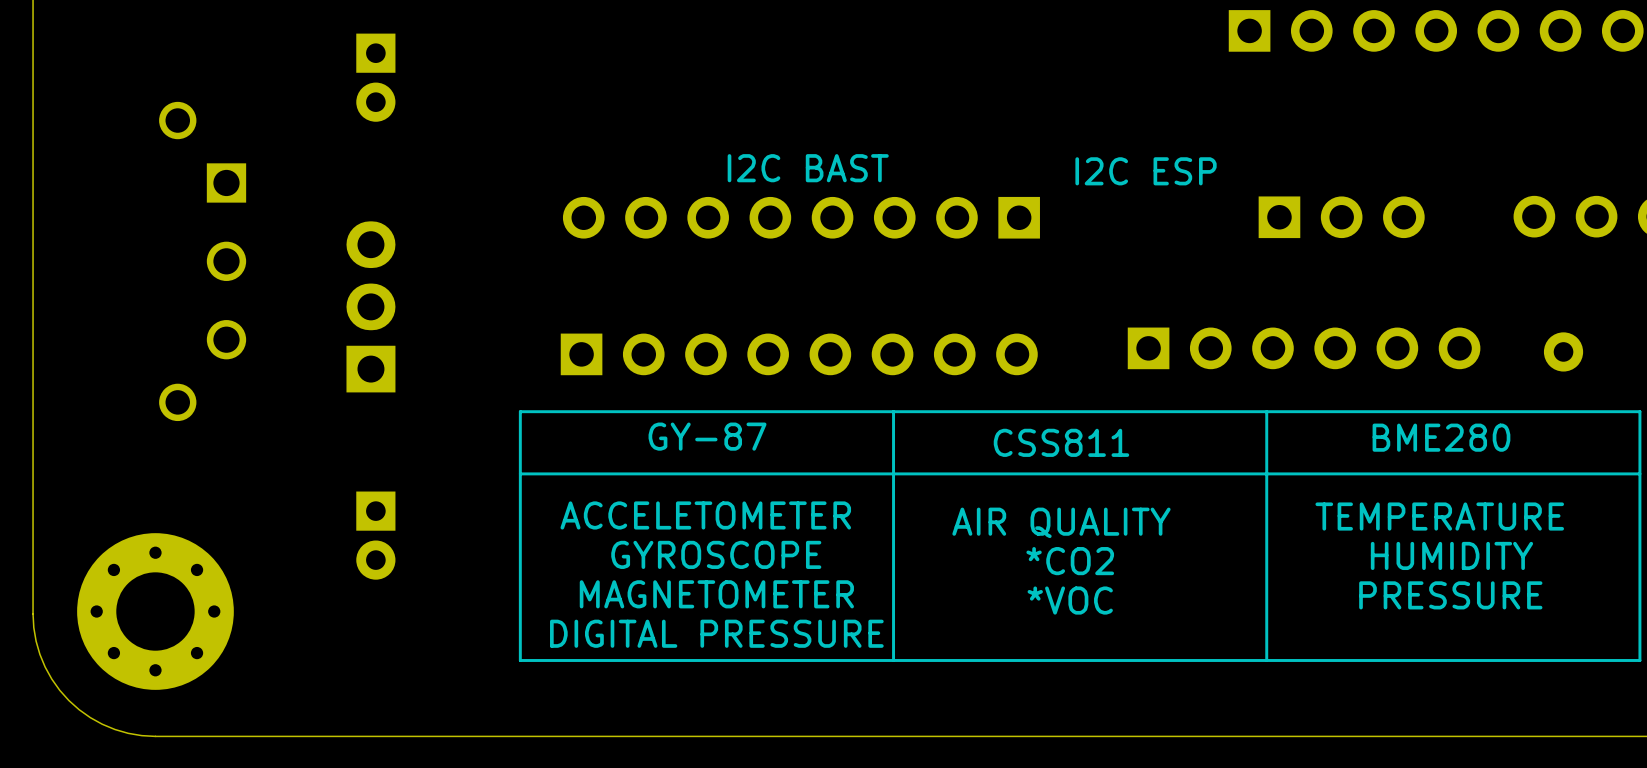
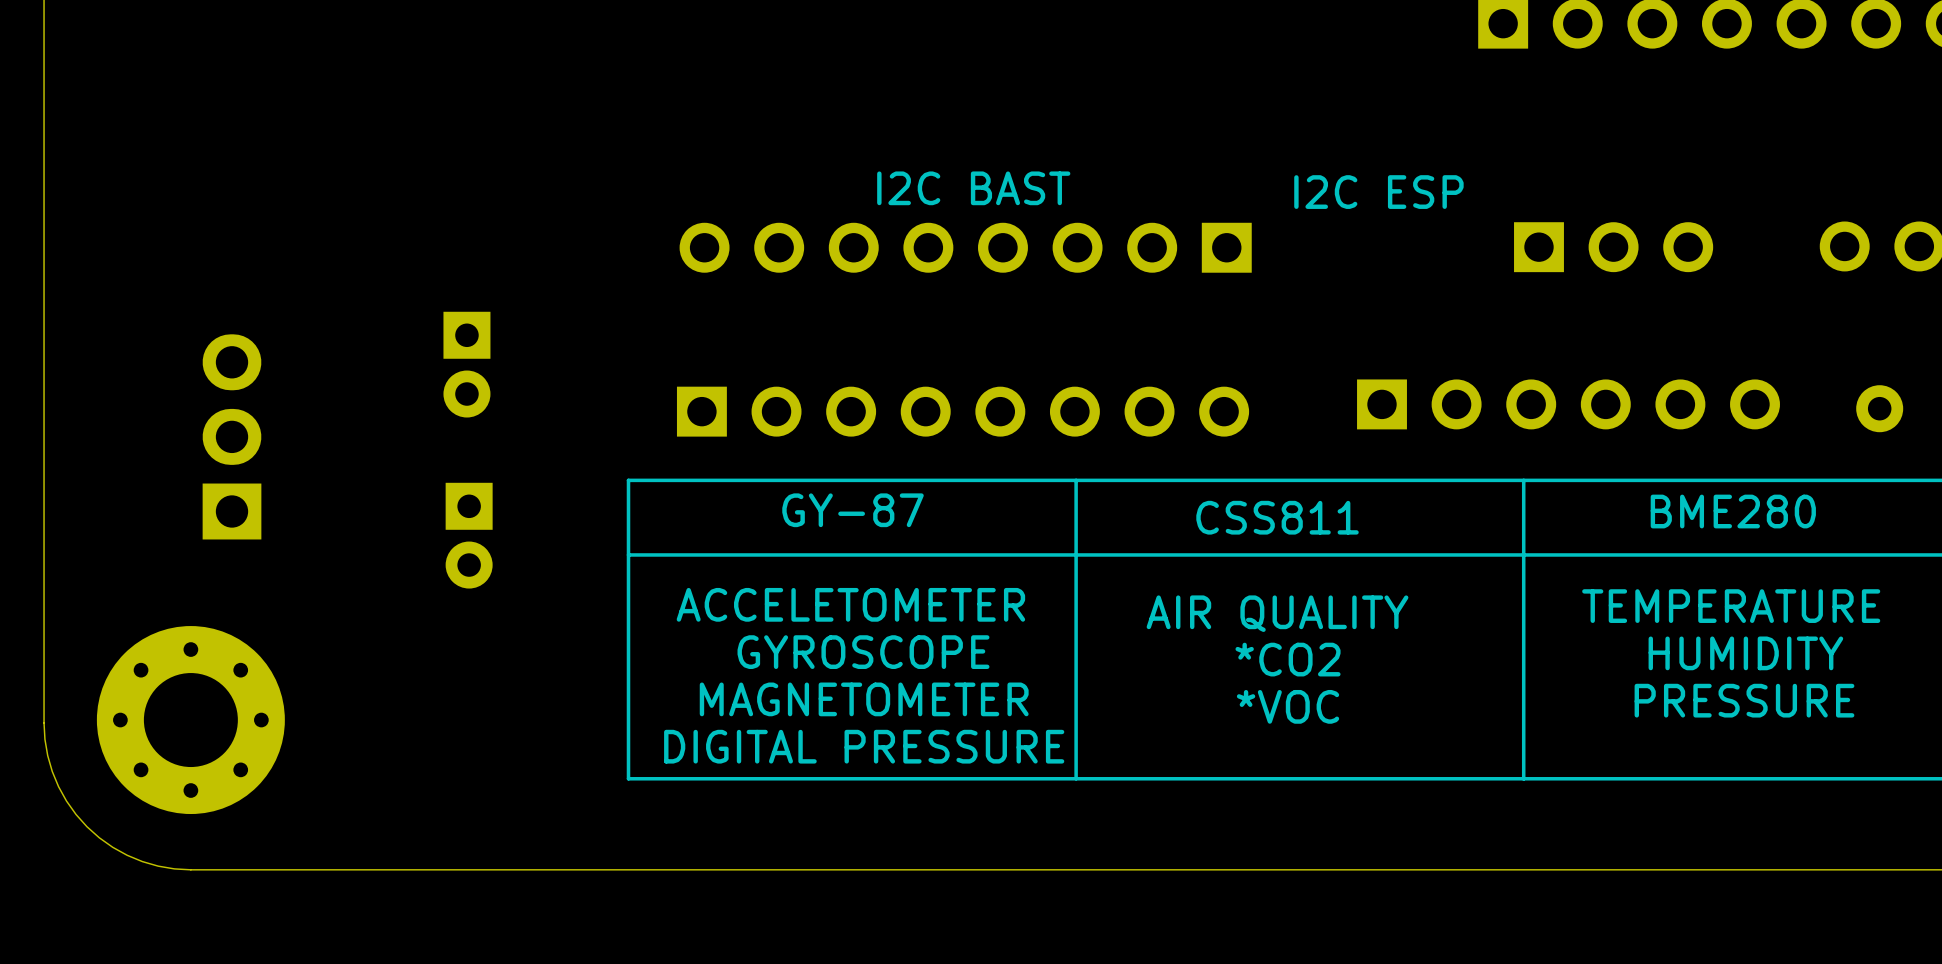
part: (375, 77) -> none
part footprint: [346, 221, 396, 393] -> [443, 311, 491, 418]
part: (202, 261) -> none
part: none -> (232, 436)
part position: (375, 535) -> (469, 535)

